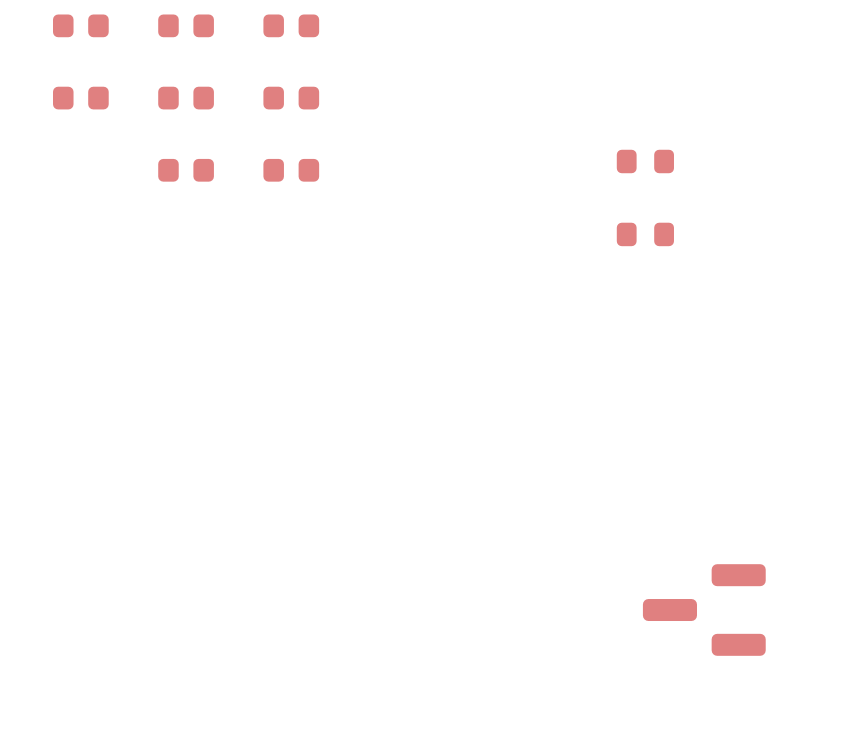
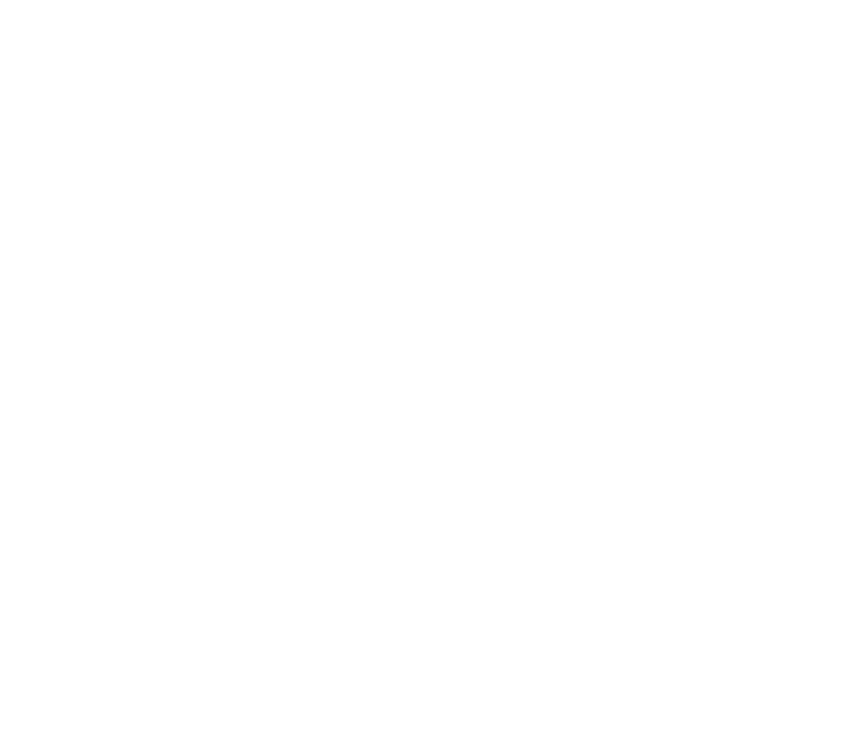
part: (80, 25) -> none
part: (186, 25) -> none
part: (291, 25) -> none
part: (80, 98) -> none
part: (186, 98) -> none
part: (291, 98) -> none
part: (645, 161) -> none
part: (186, 170) -> none
part: (291, 170) -> none
part: (645, 234) -> none
part: (704, 610) -> none

